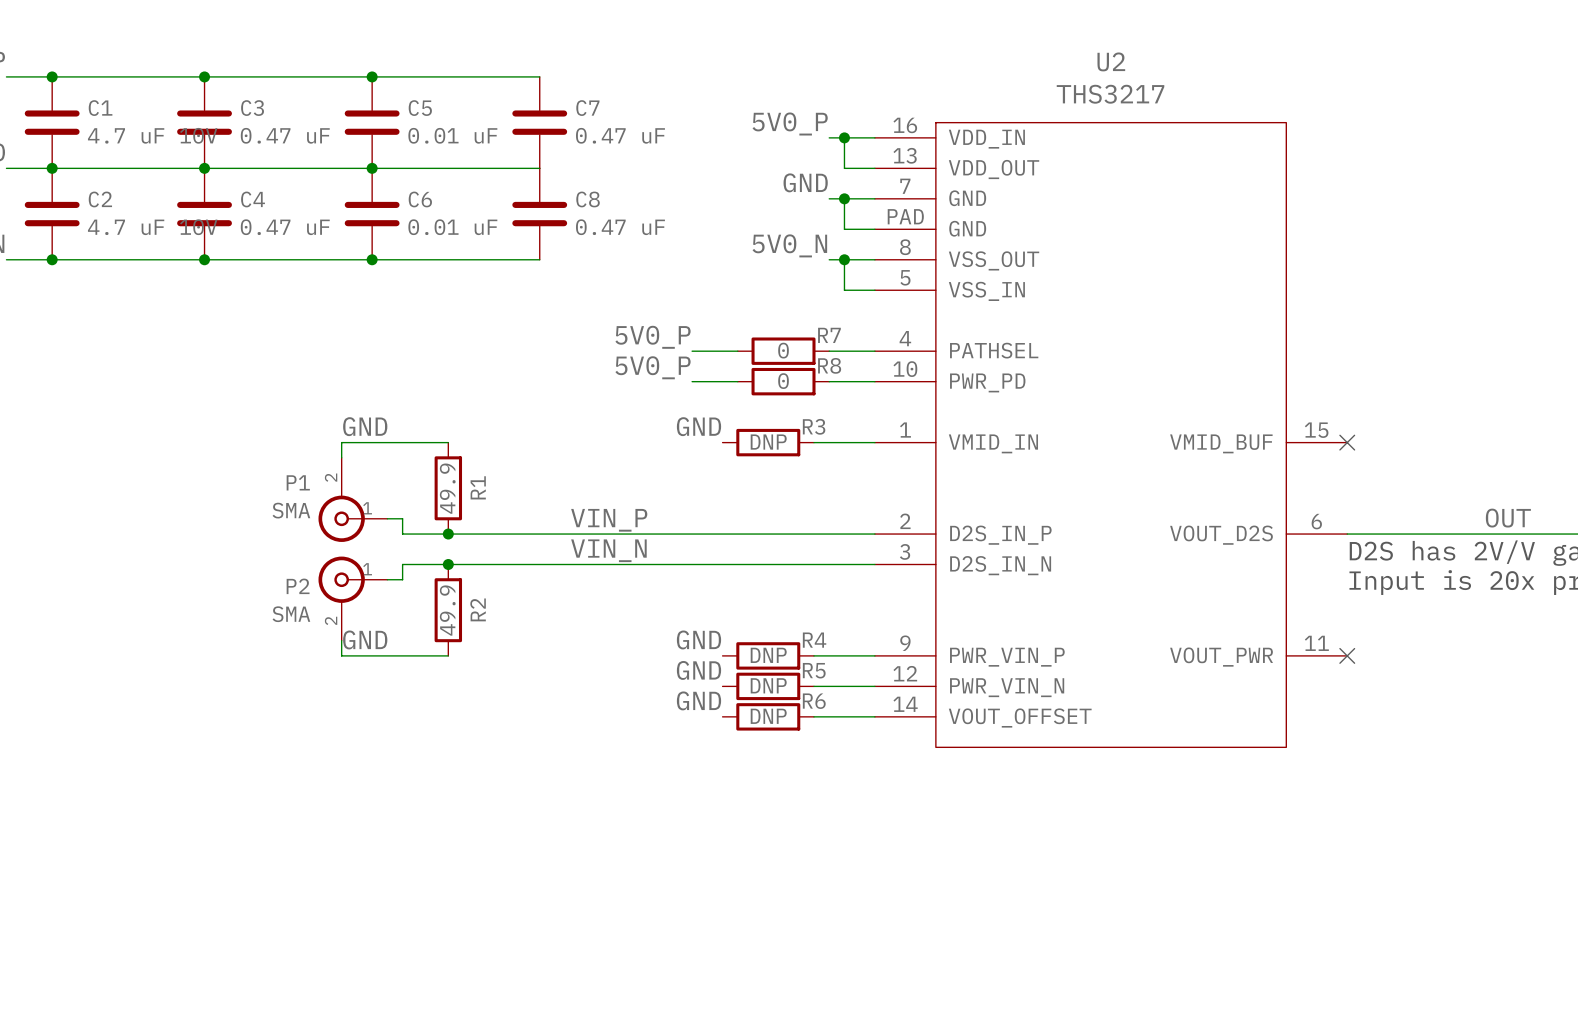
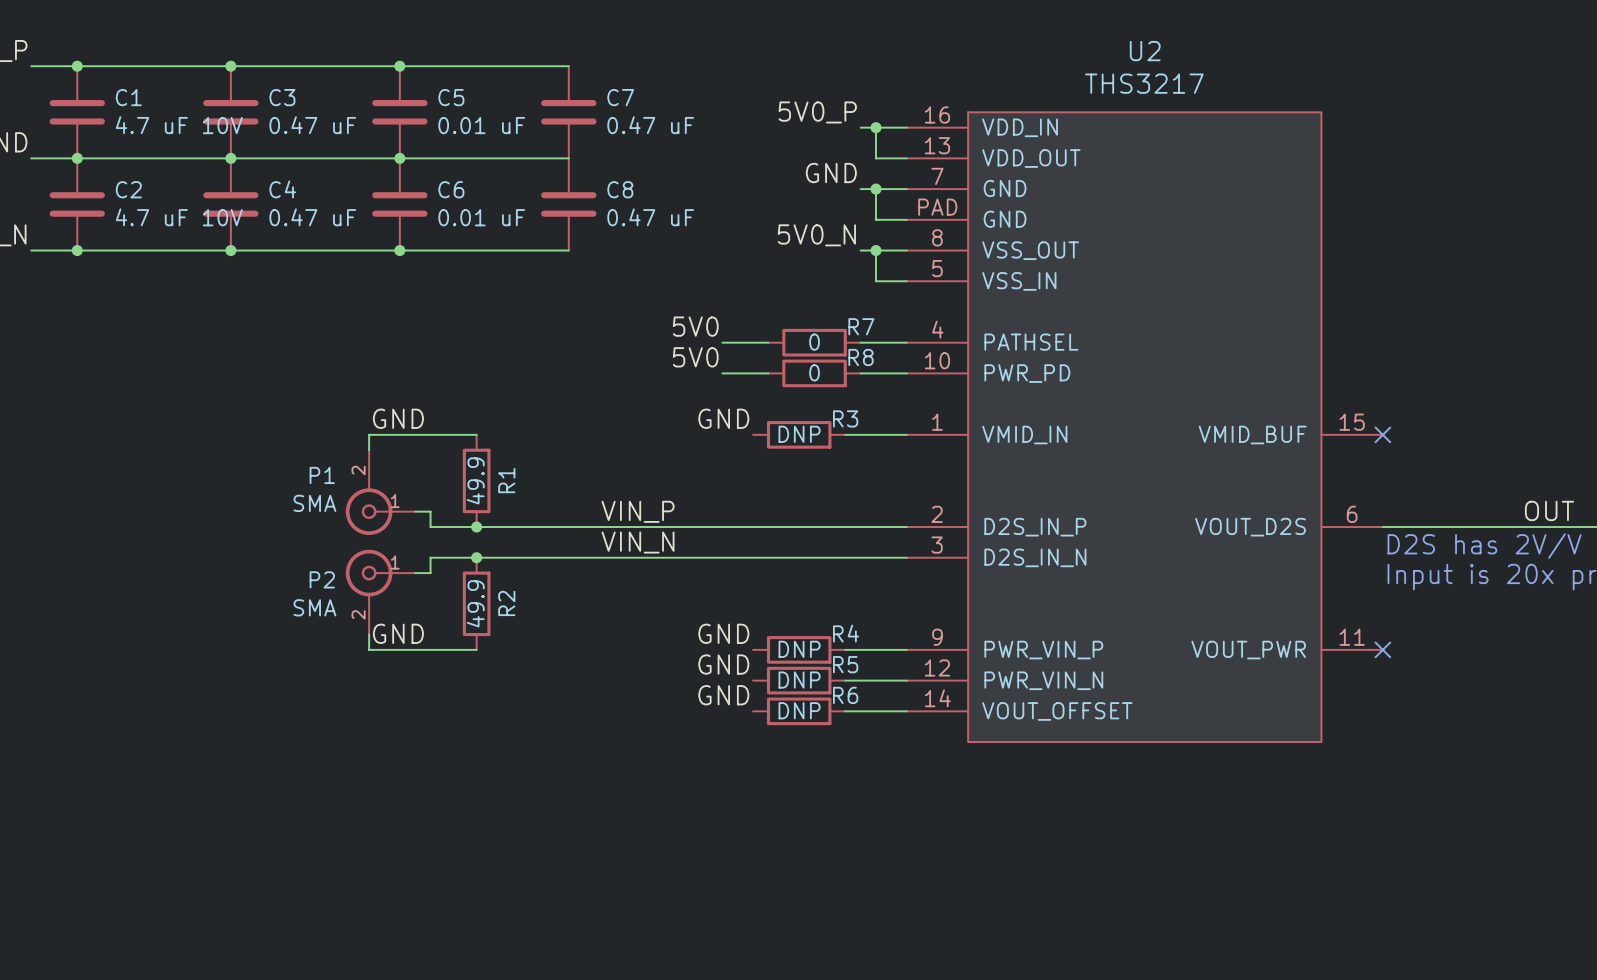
label: 5V0_P (653, 337) -> 5V0 (695, 326)
label: 5V0_P (653, 367) -> 5V0 (695, 357)

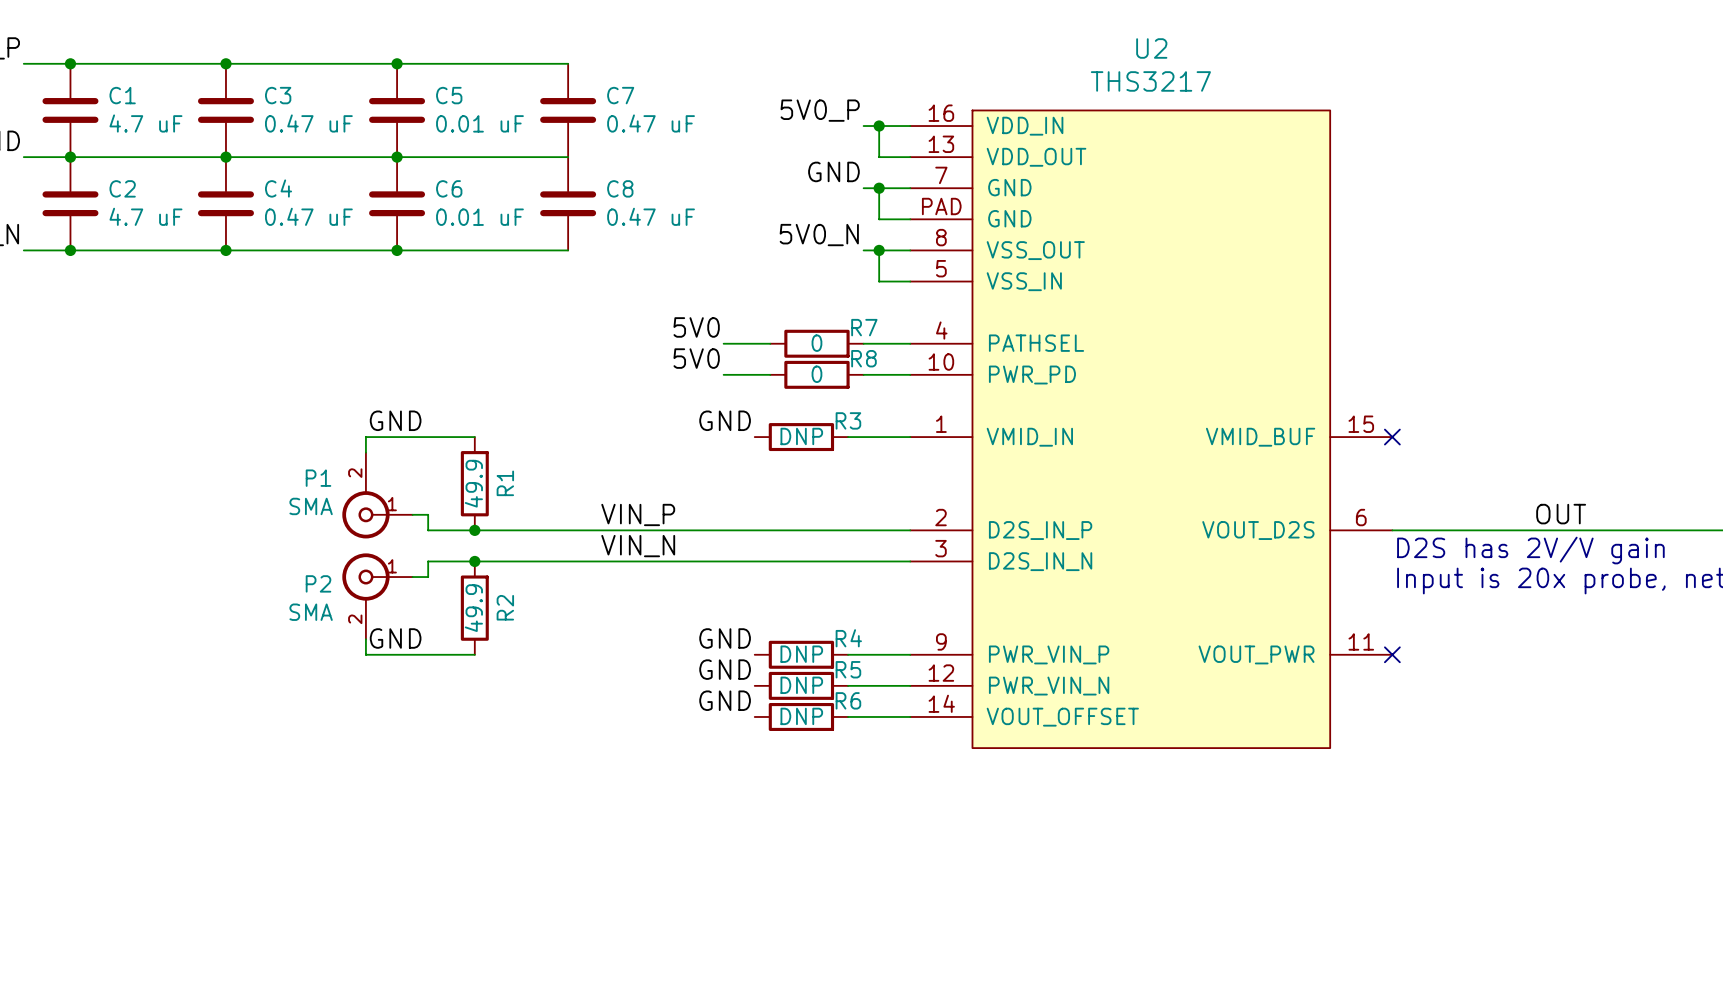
C1 value: 4.7 uF 10V (179, 125) -> 4.7 uF (145, 123)
C2 value: 4.7 uF 10V (179, 217) -> 4.7 uF (145, 216)

